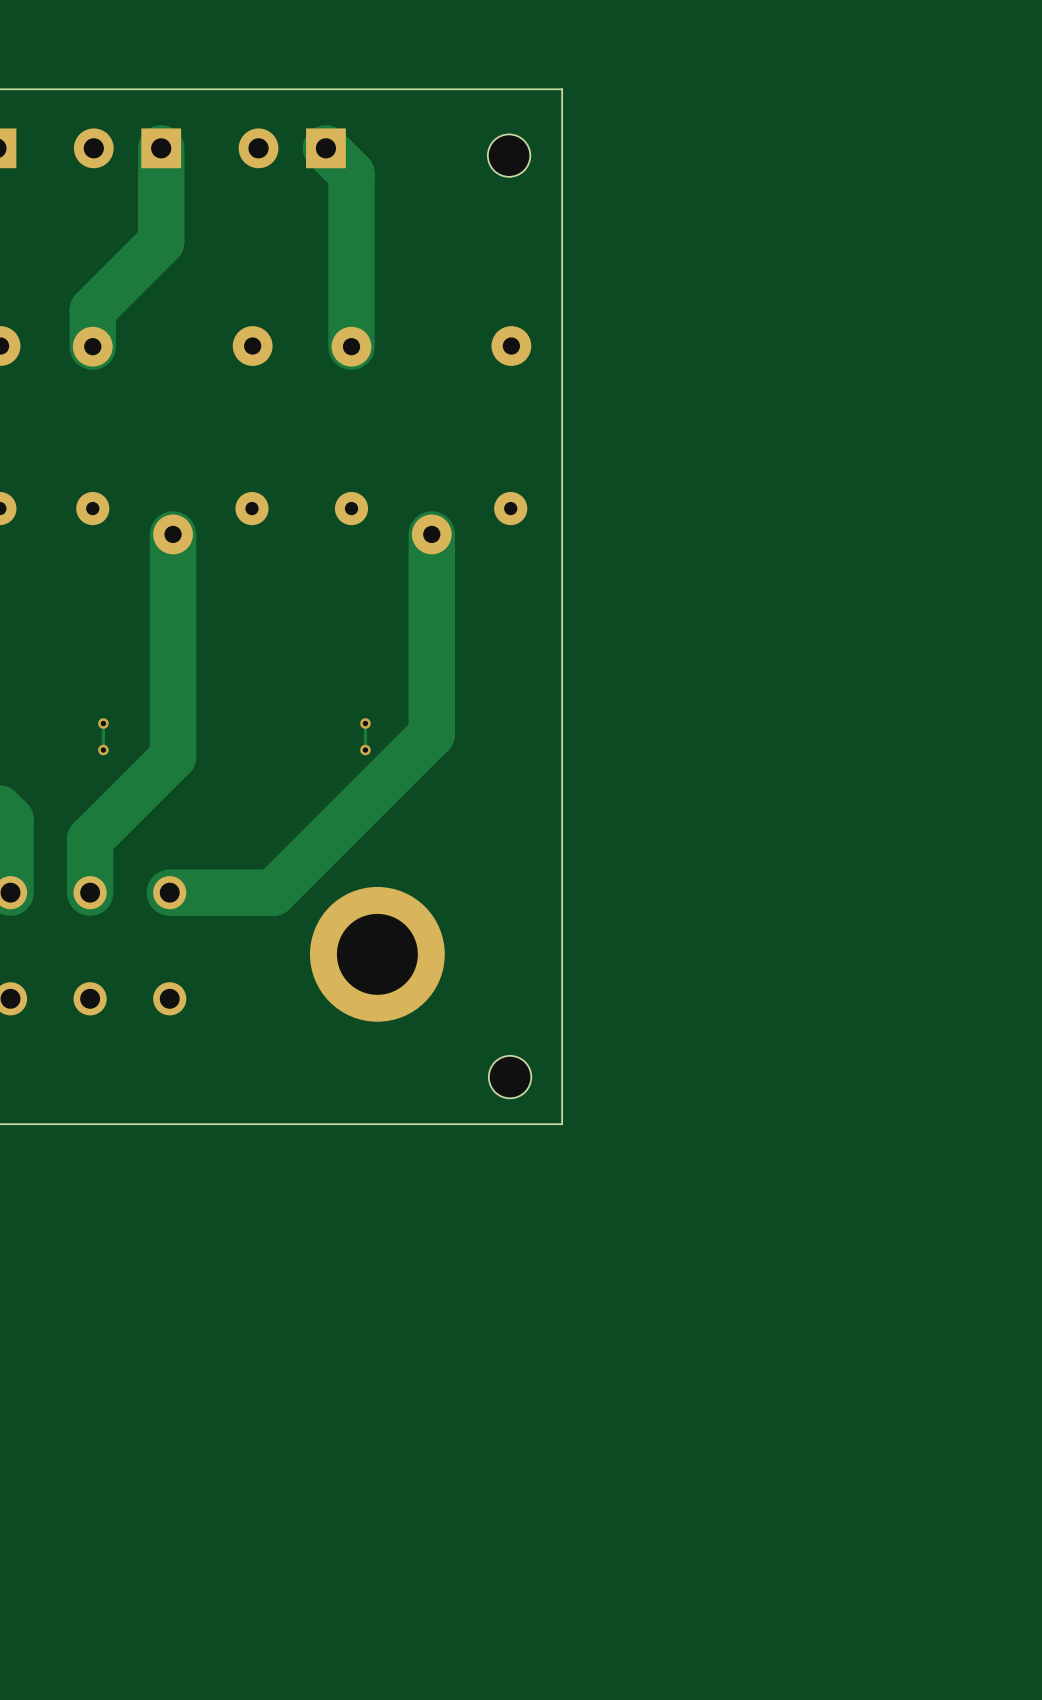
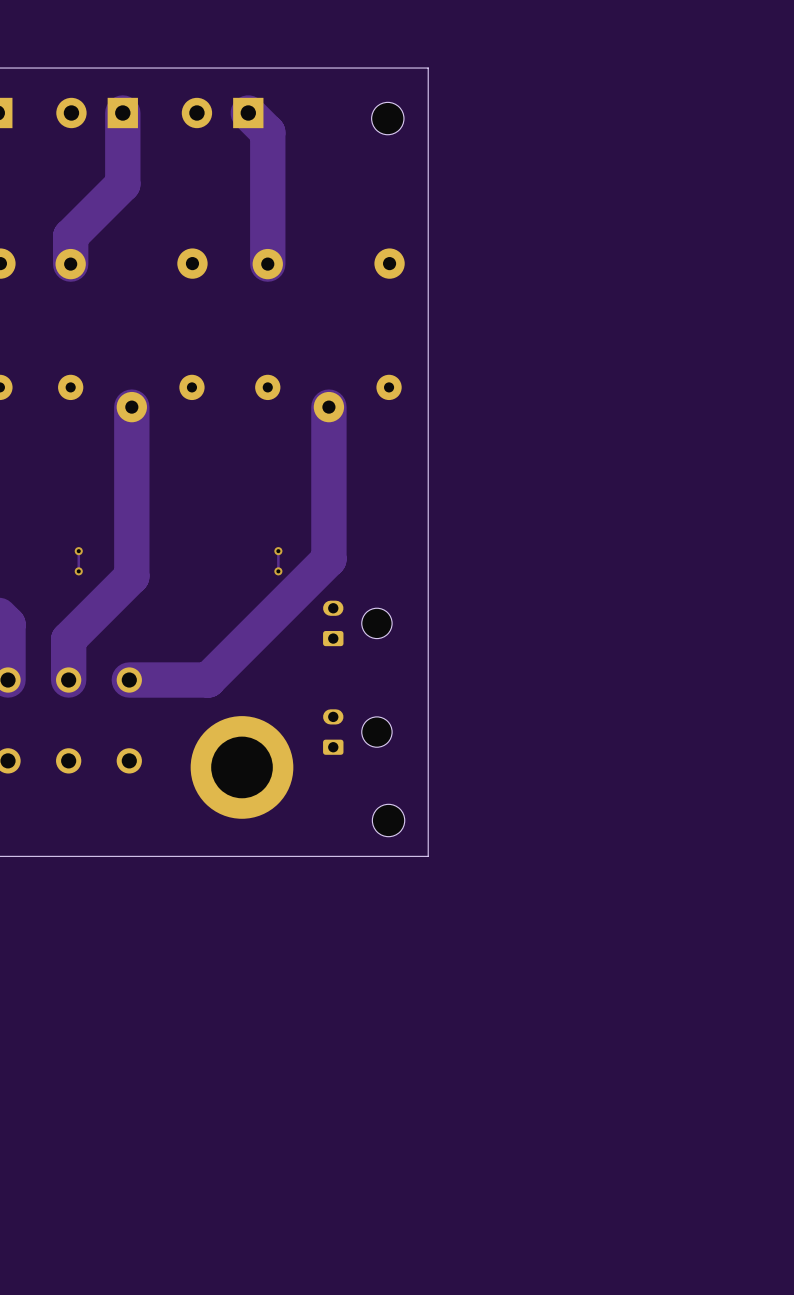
part: none -> (357, 623)
part position: (377, 954) -> (242, 767)
part: none -> (357, 732)

